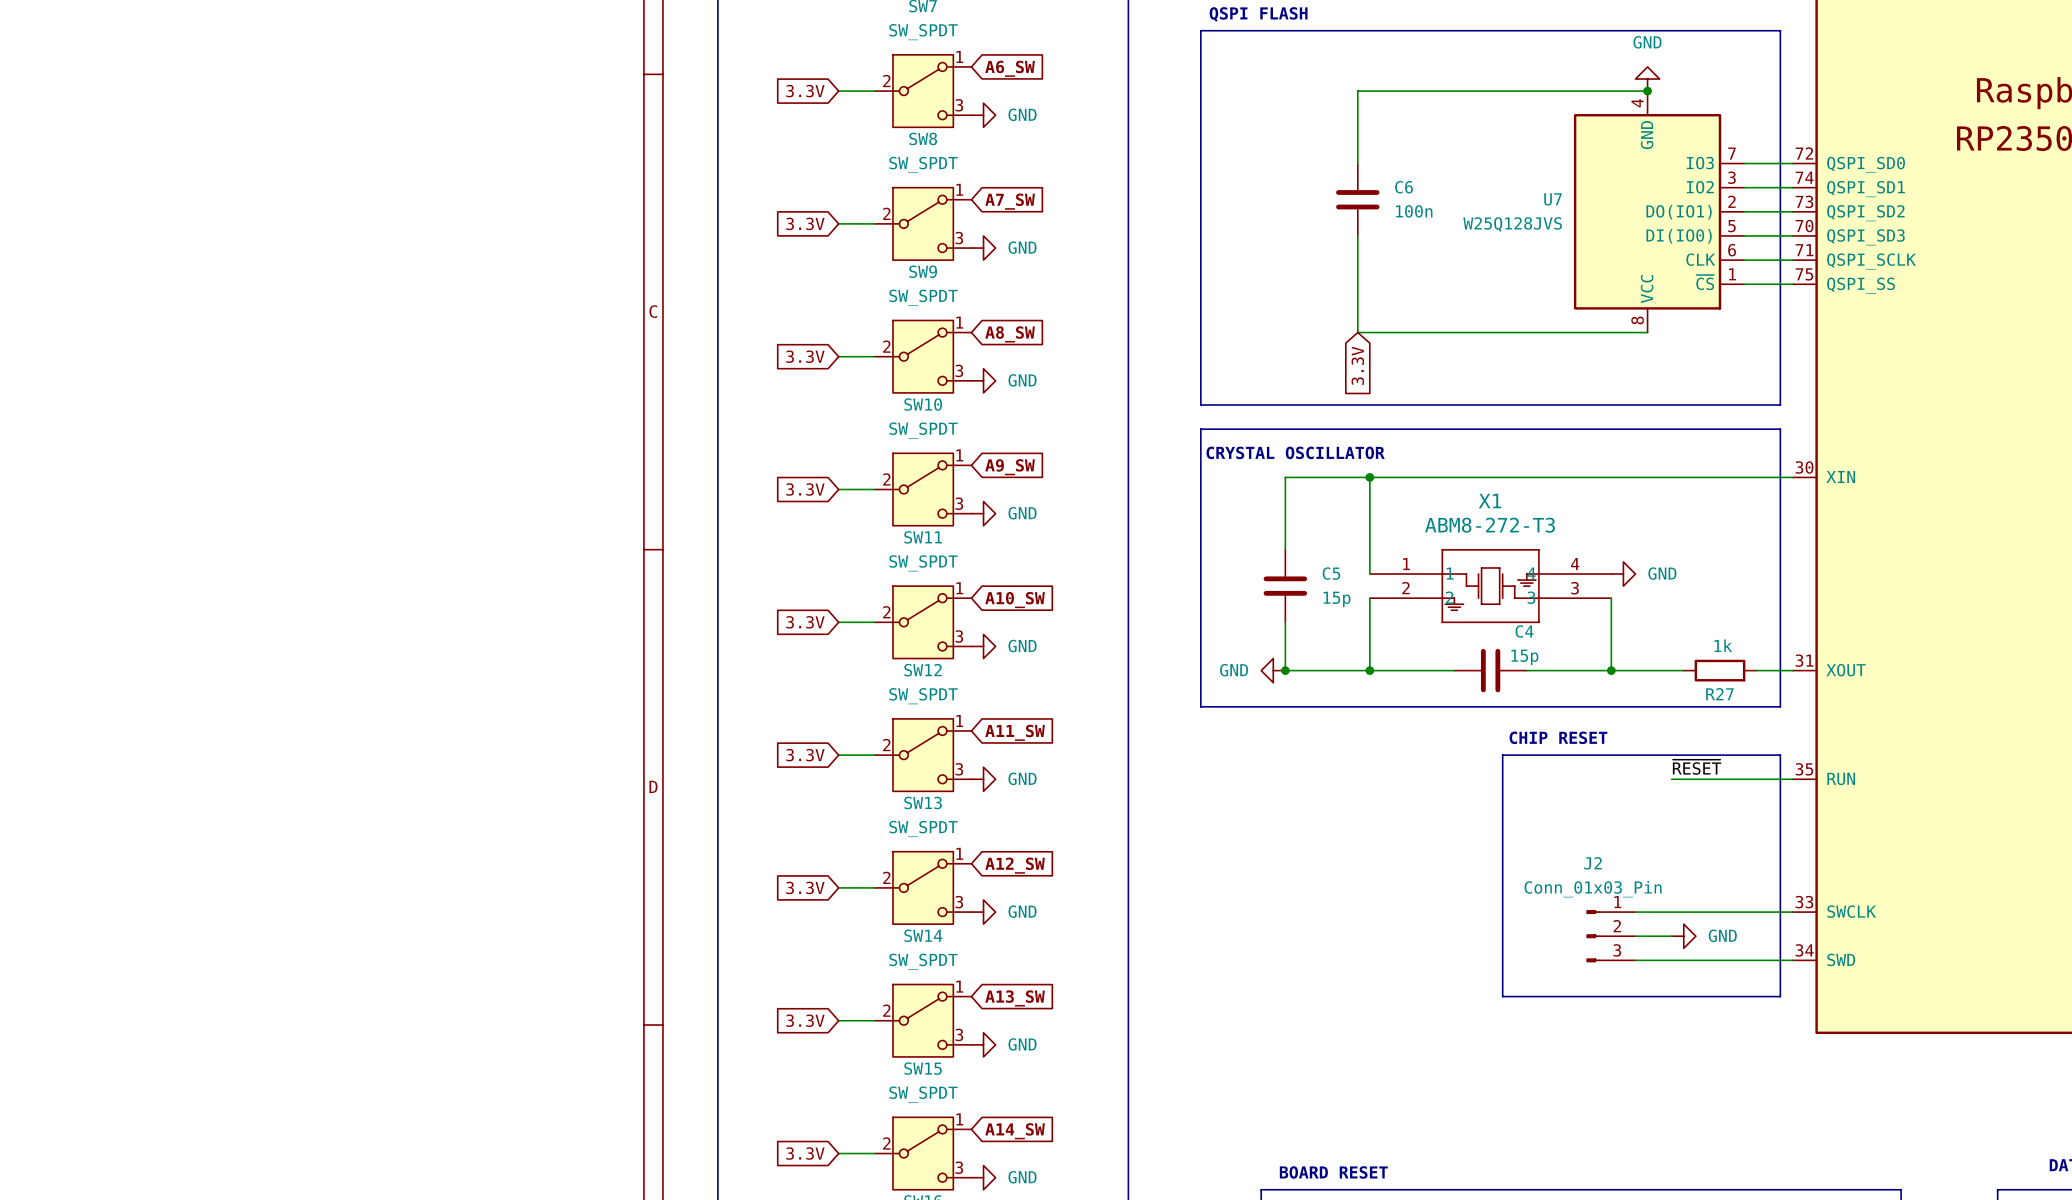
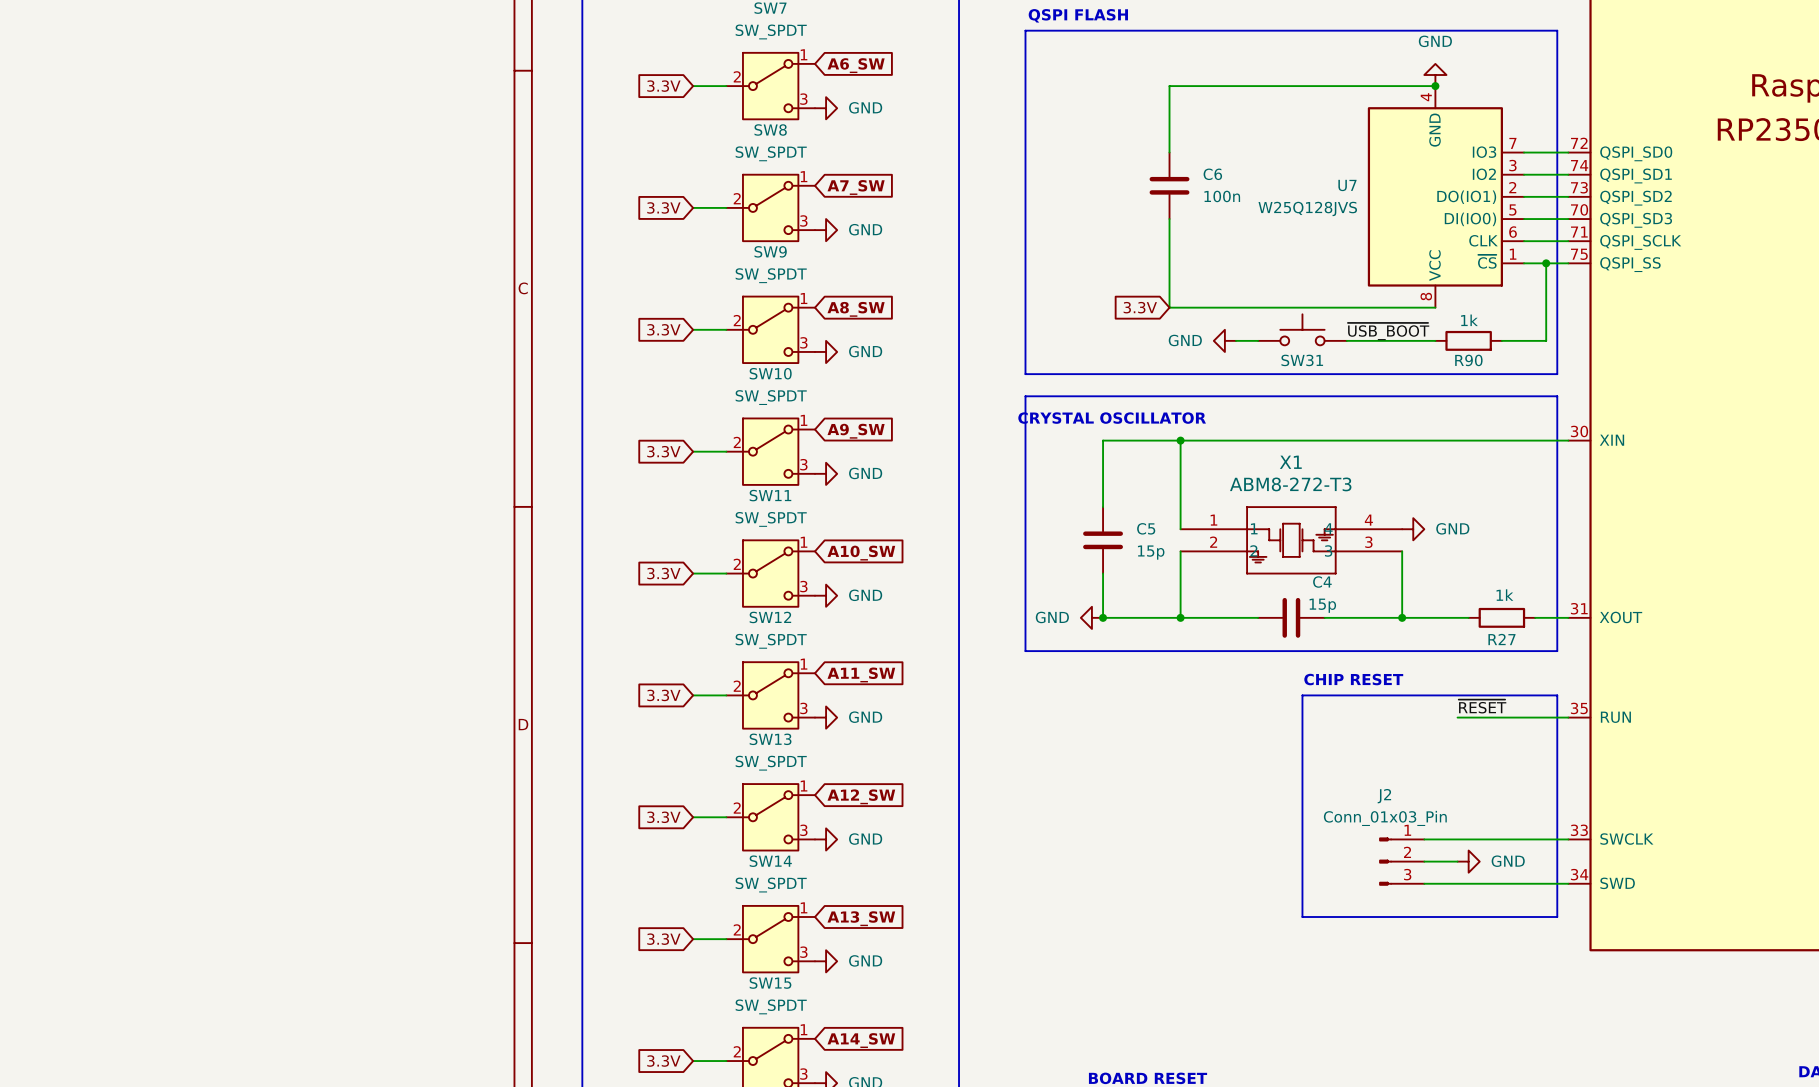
wire: none -> (1546, 263) (1546, 340) (1501, 340)
junction: none -> (1546, 263)
SW31: none -> (1302, 329)
label: none -> ~{USB_BOOT} (1388, 331)
global label rotation: 0° (1357, 365) -> 90° clockwise (1140, 307)
power symbol: none -> GND (1224, 340)
wire: none -> (1235, 340) (1258, 340)
wire: none -> (1346, 340) (1435, 340)
R90: none -> 1k (1468, 340)

